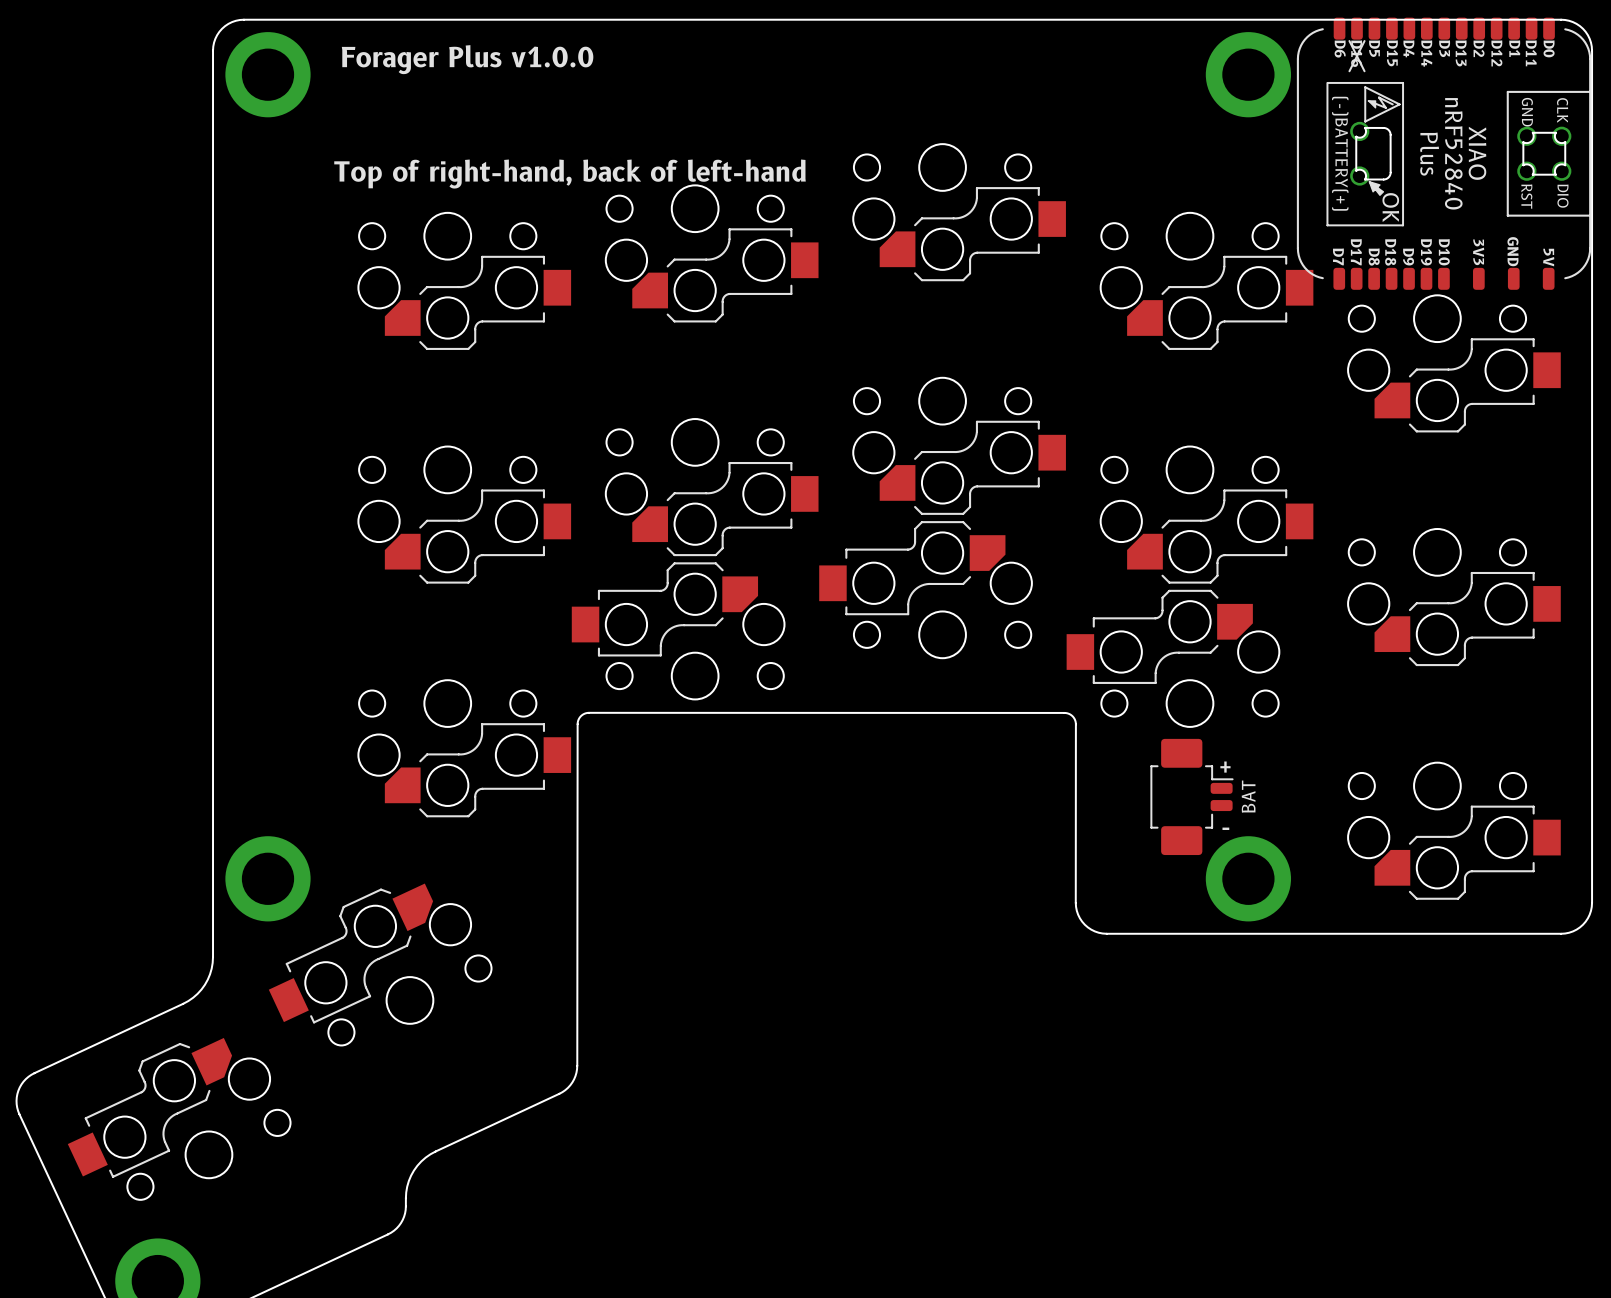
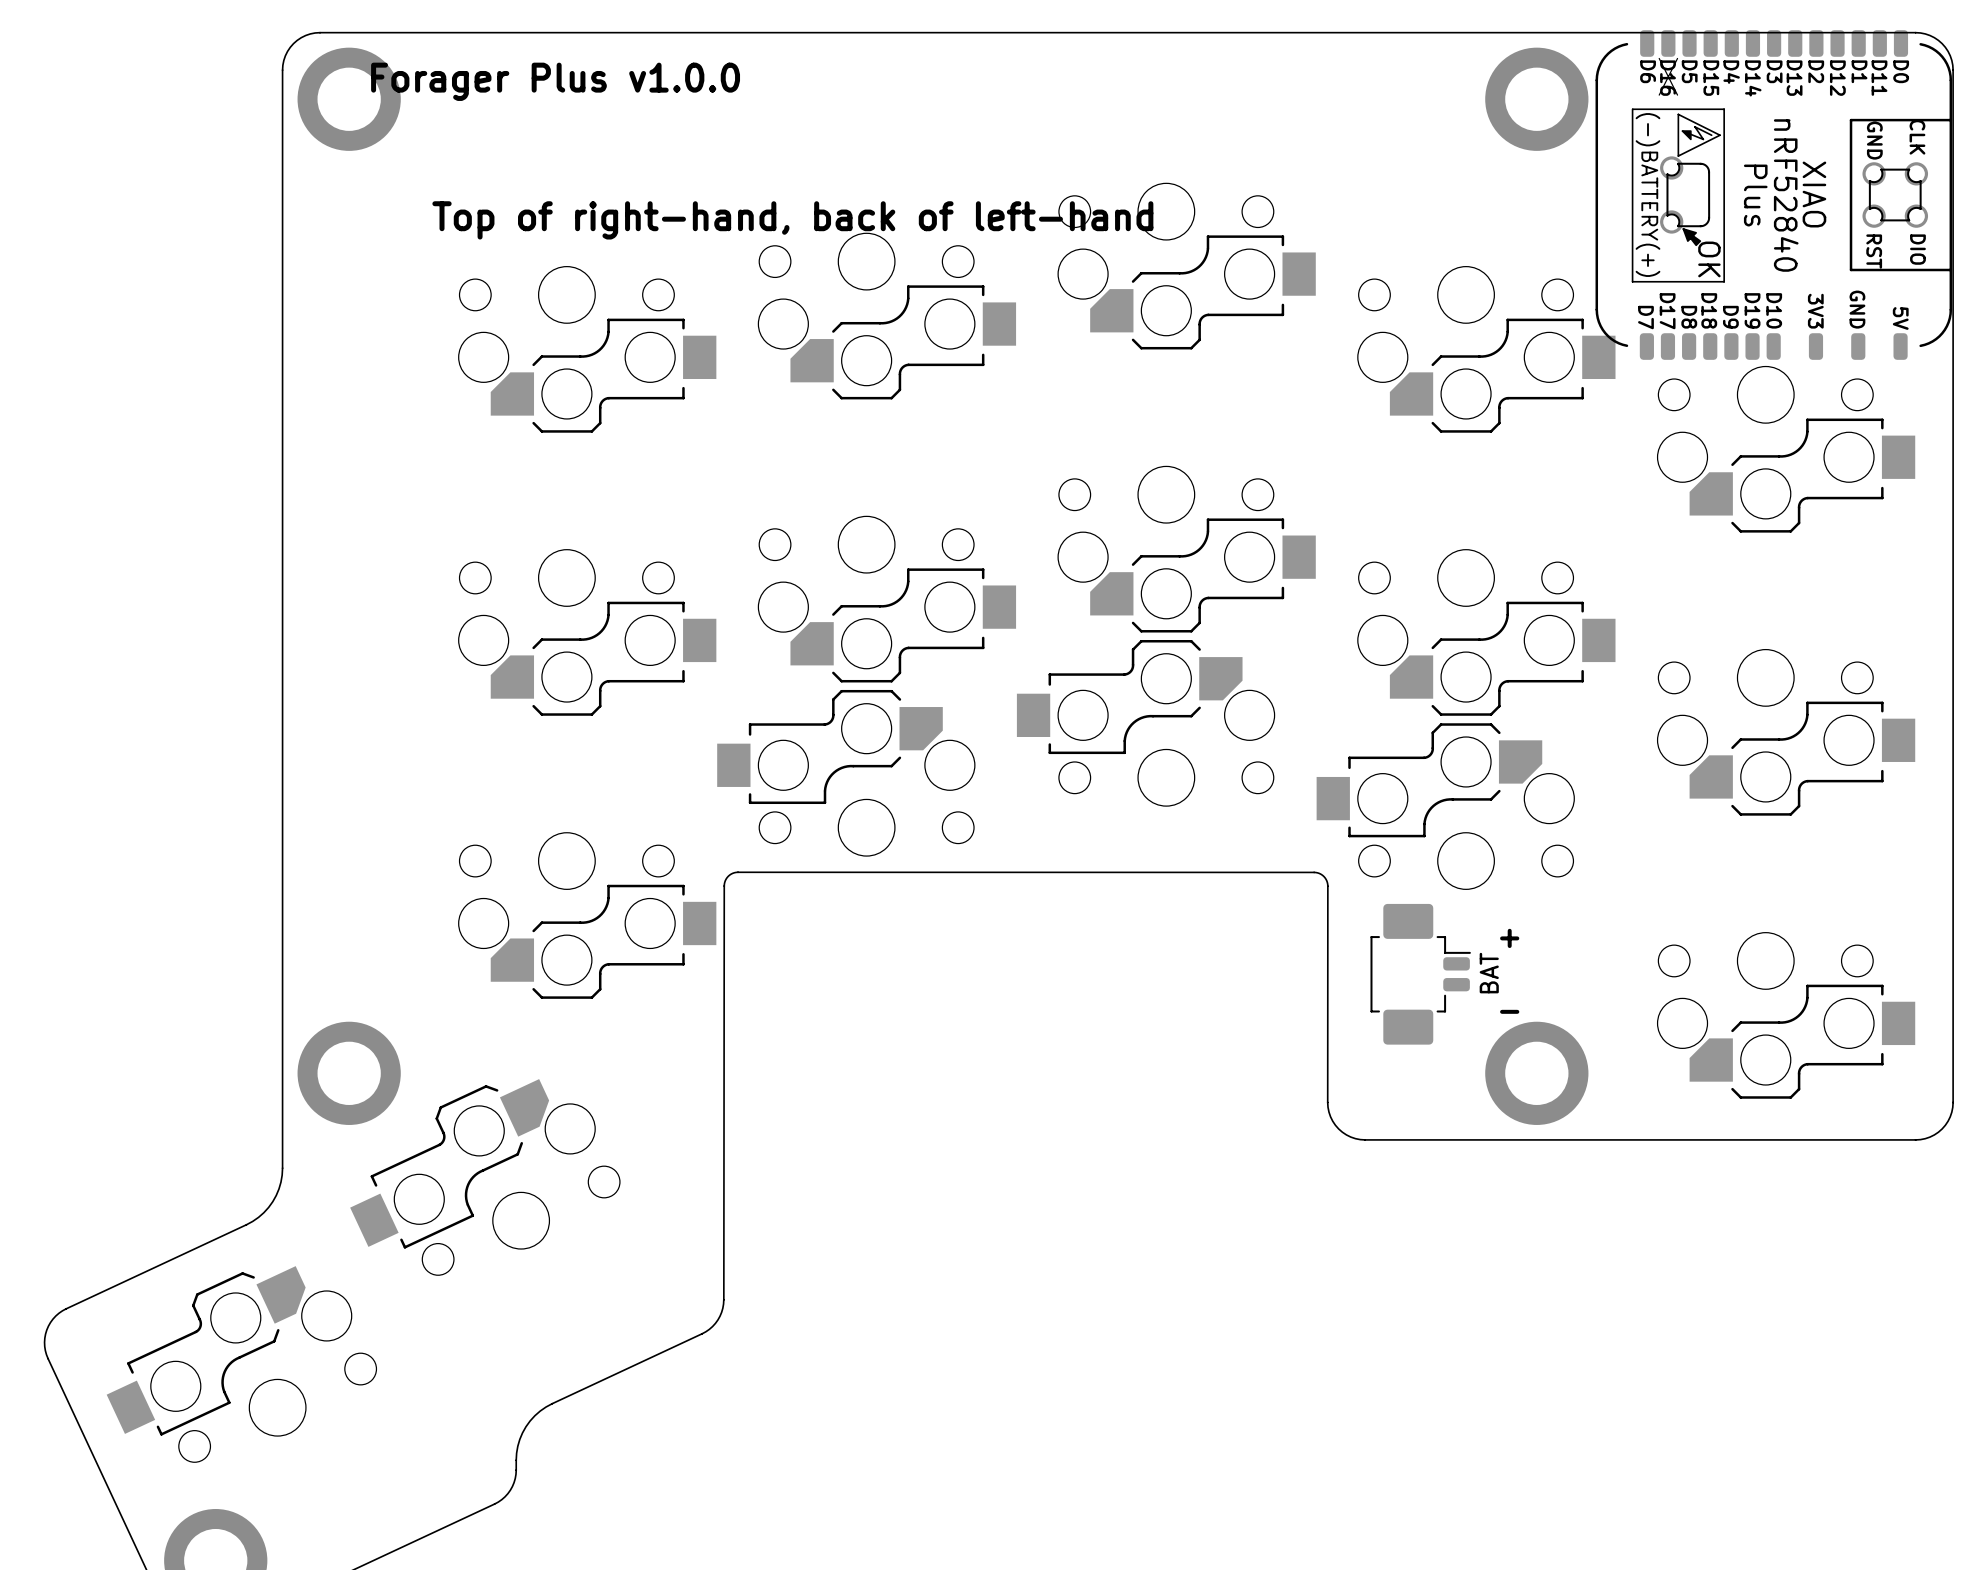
BAT position: (1191, 796) -> (1420, 974)

